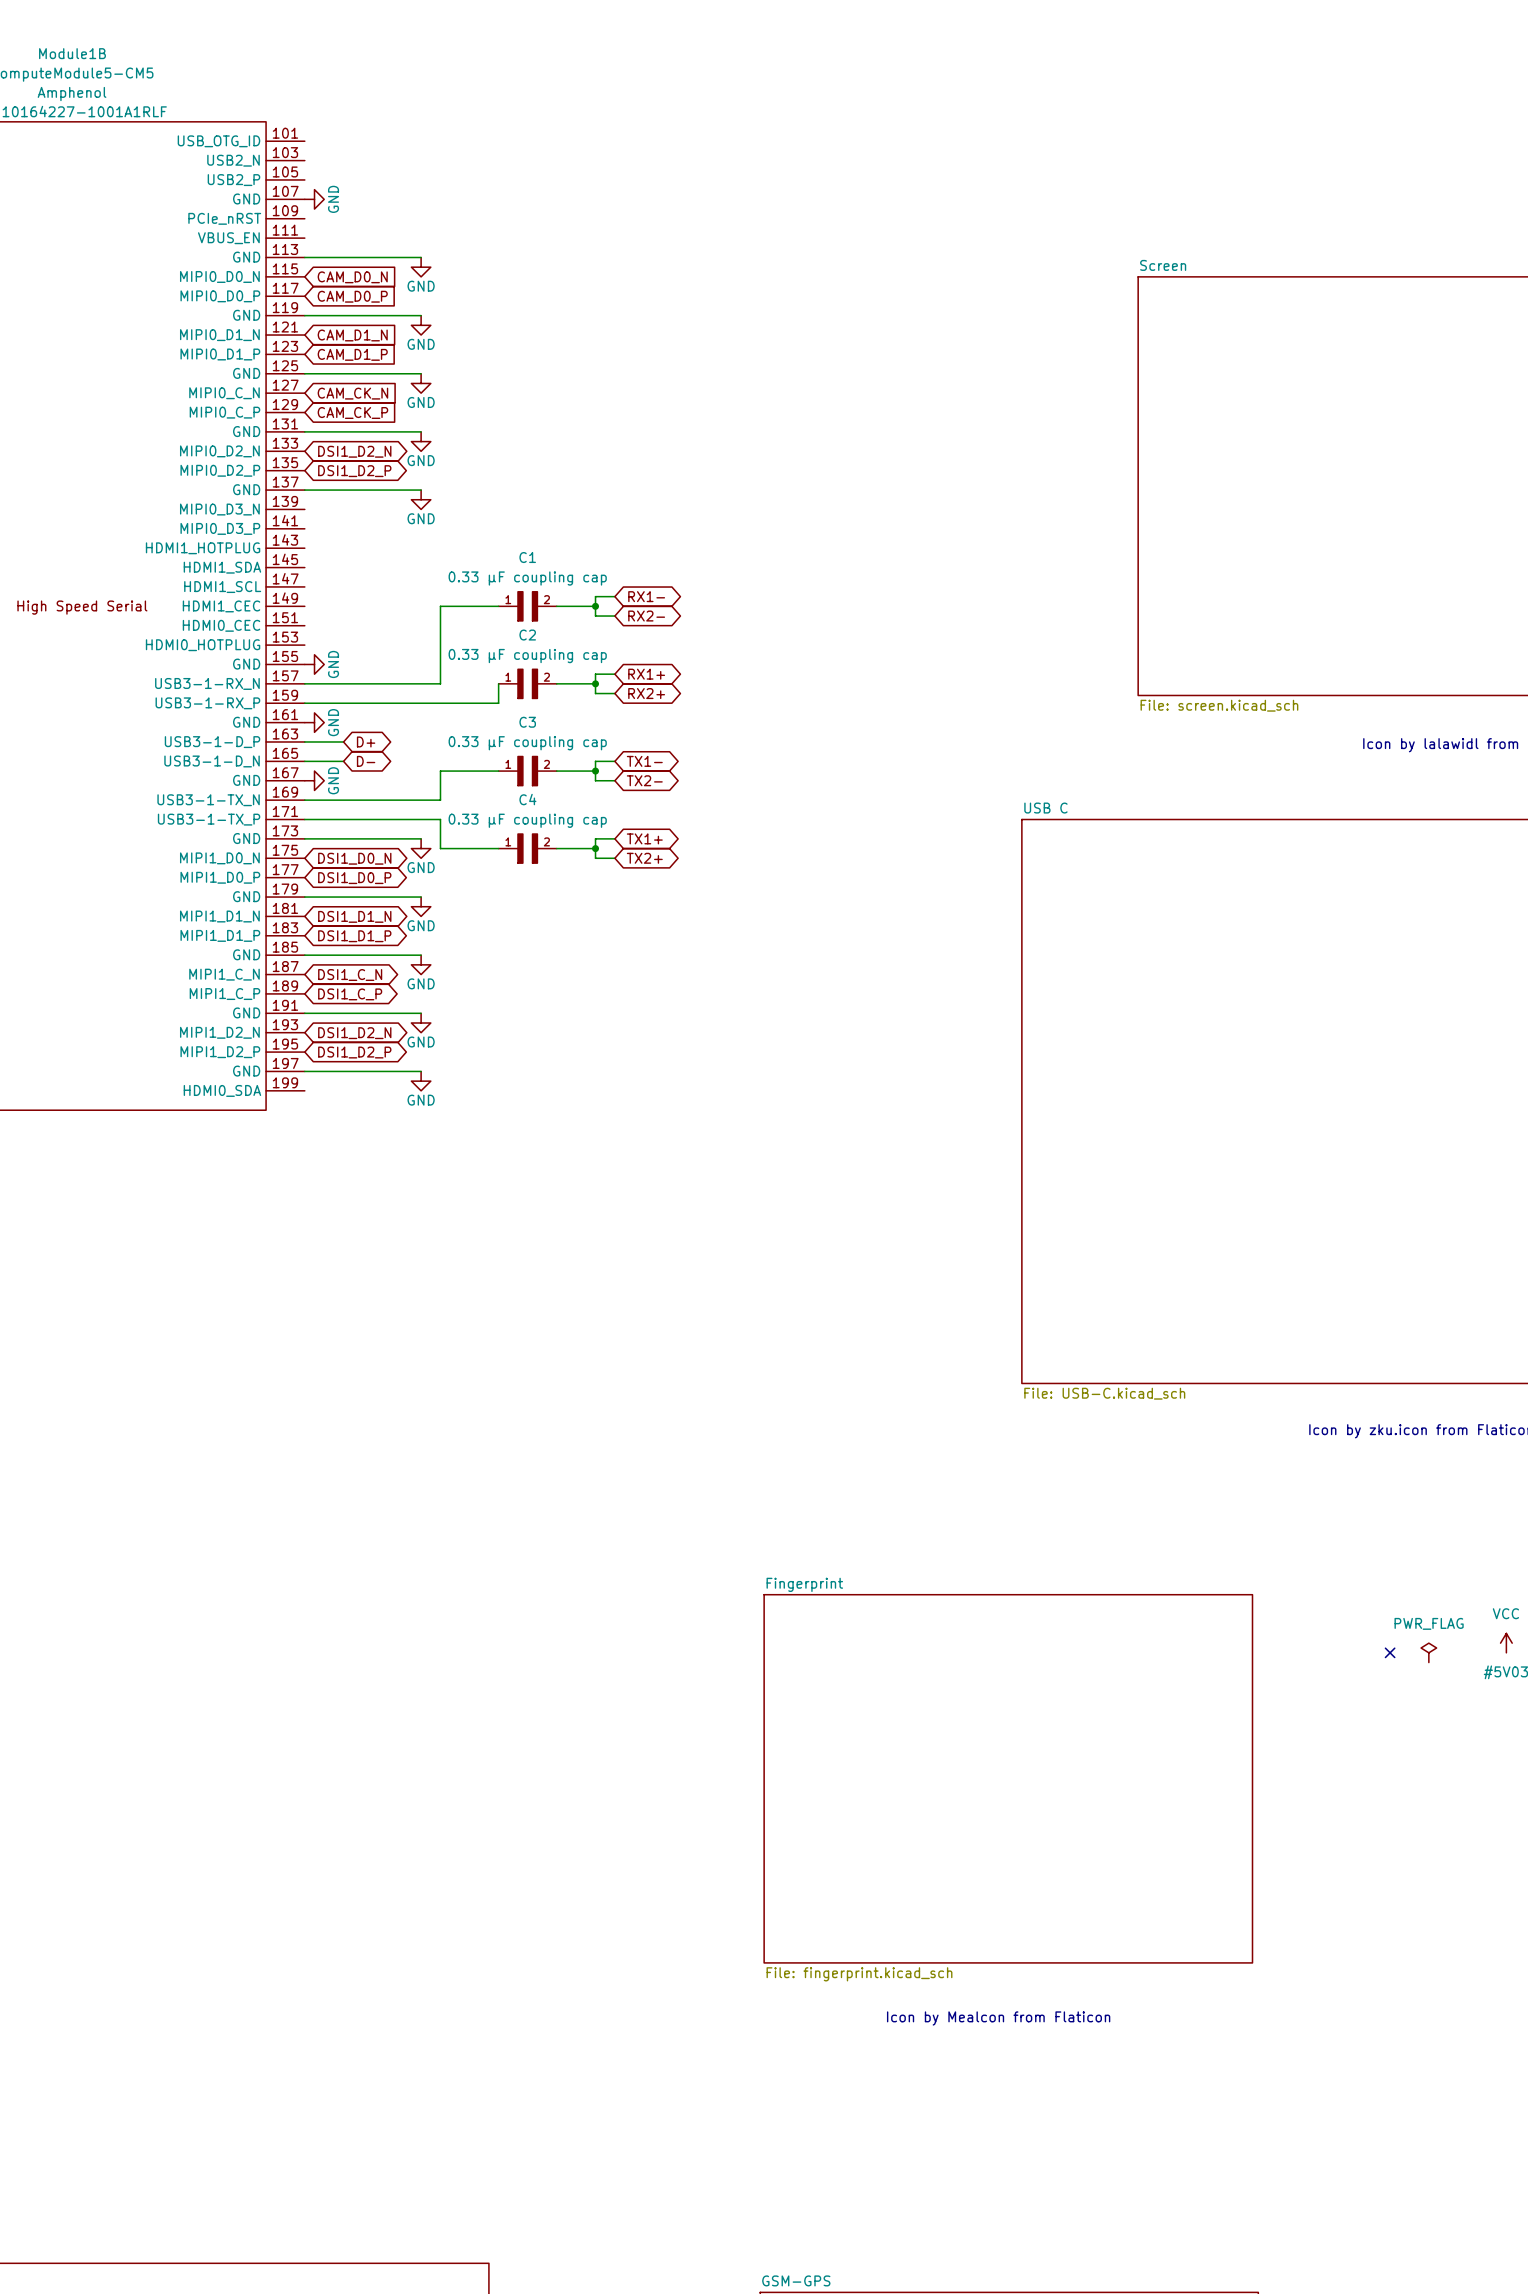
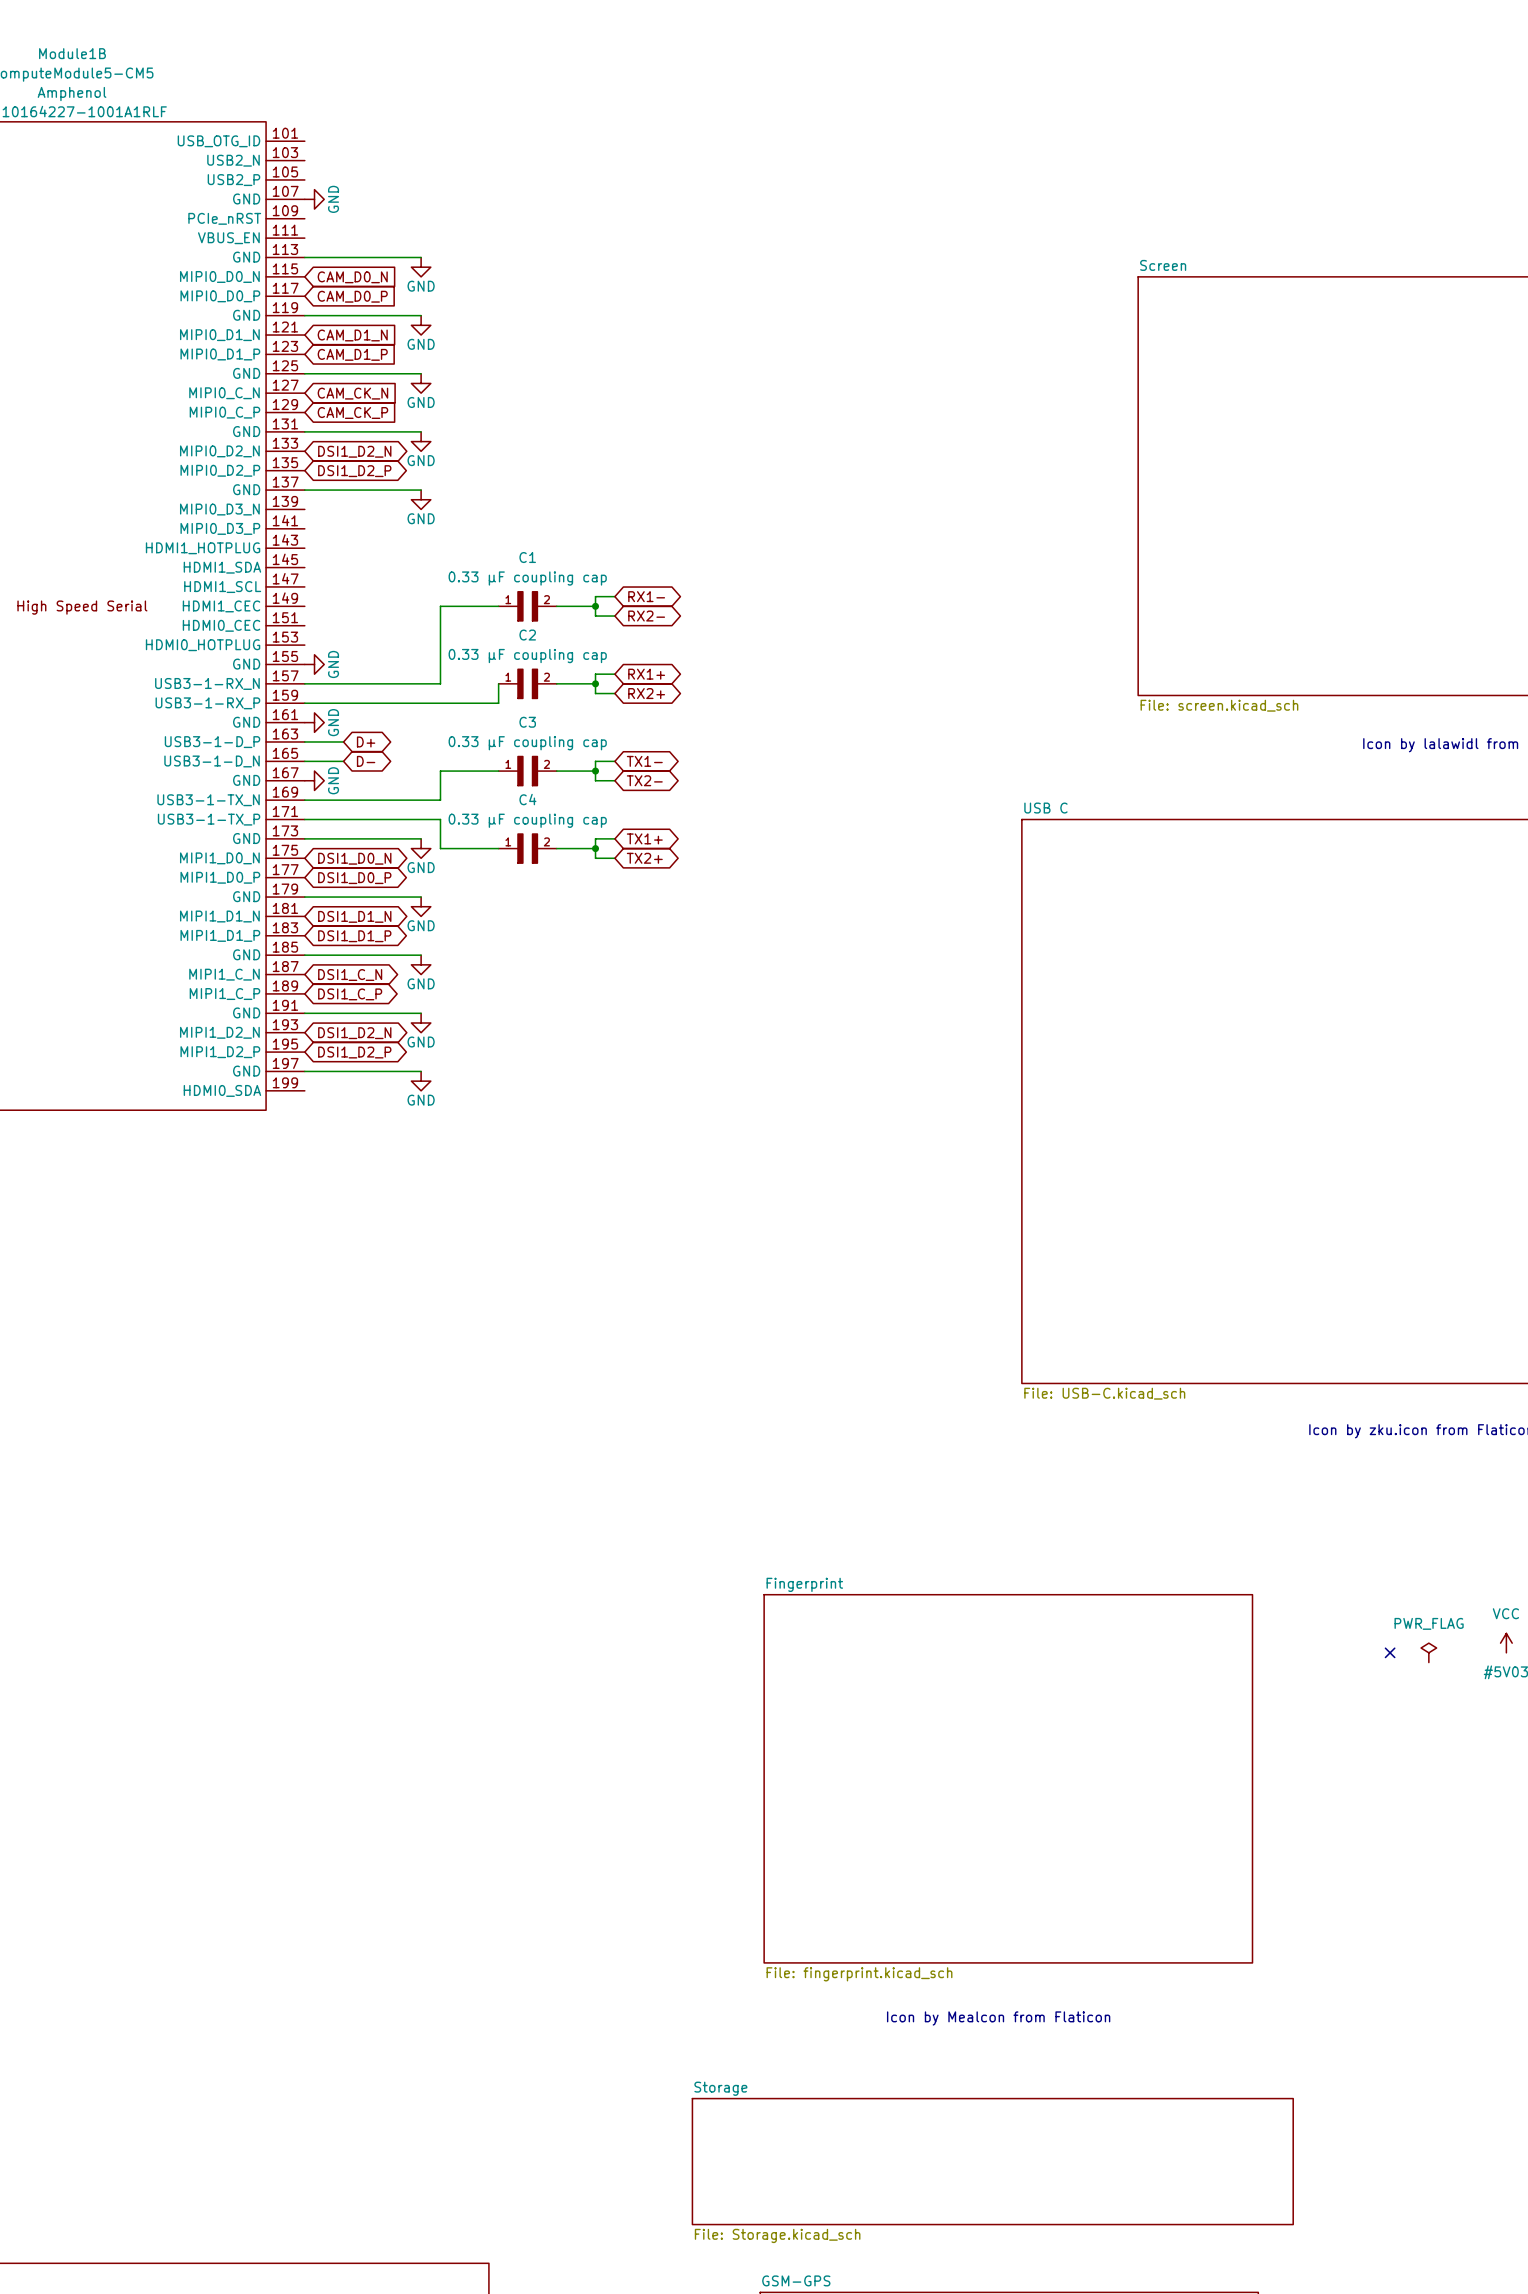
sheet Storage: none -> File: Storage.kicad_sch (992, 2161)

